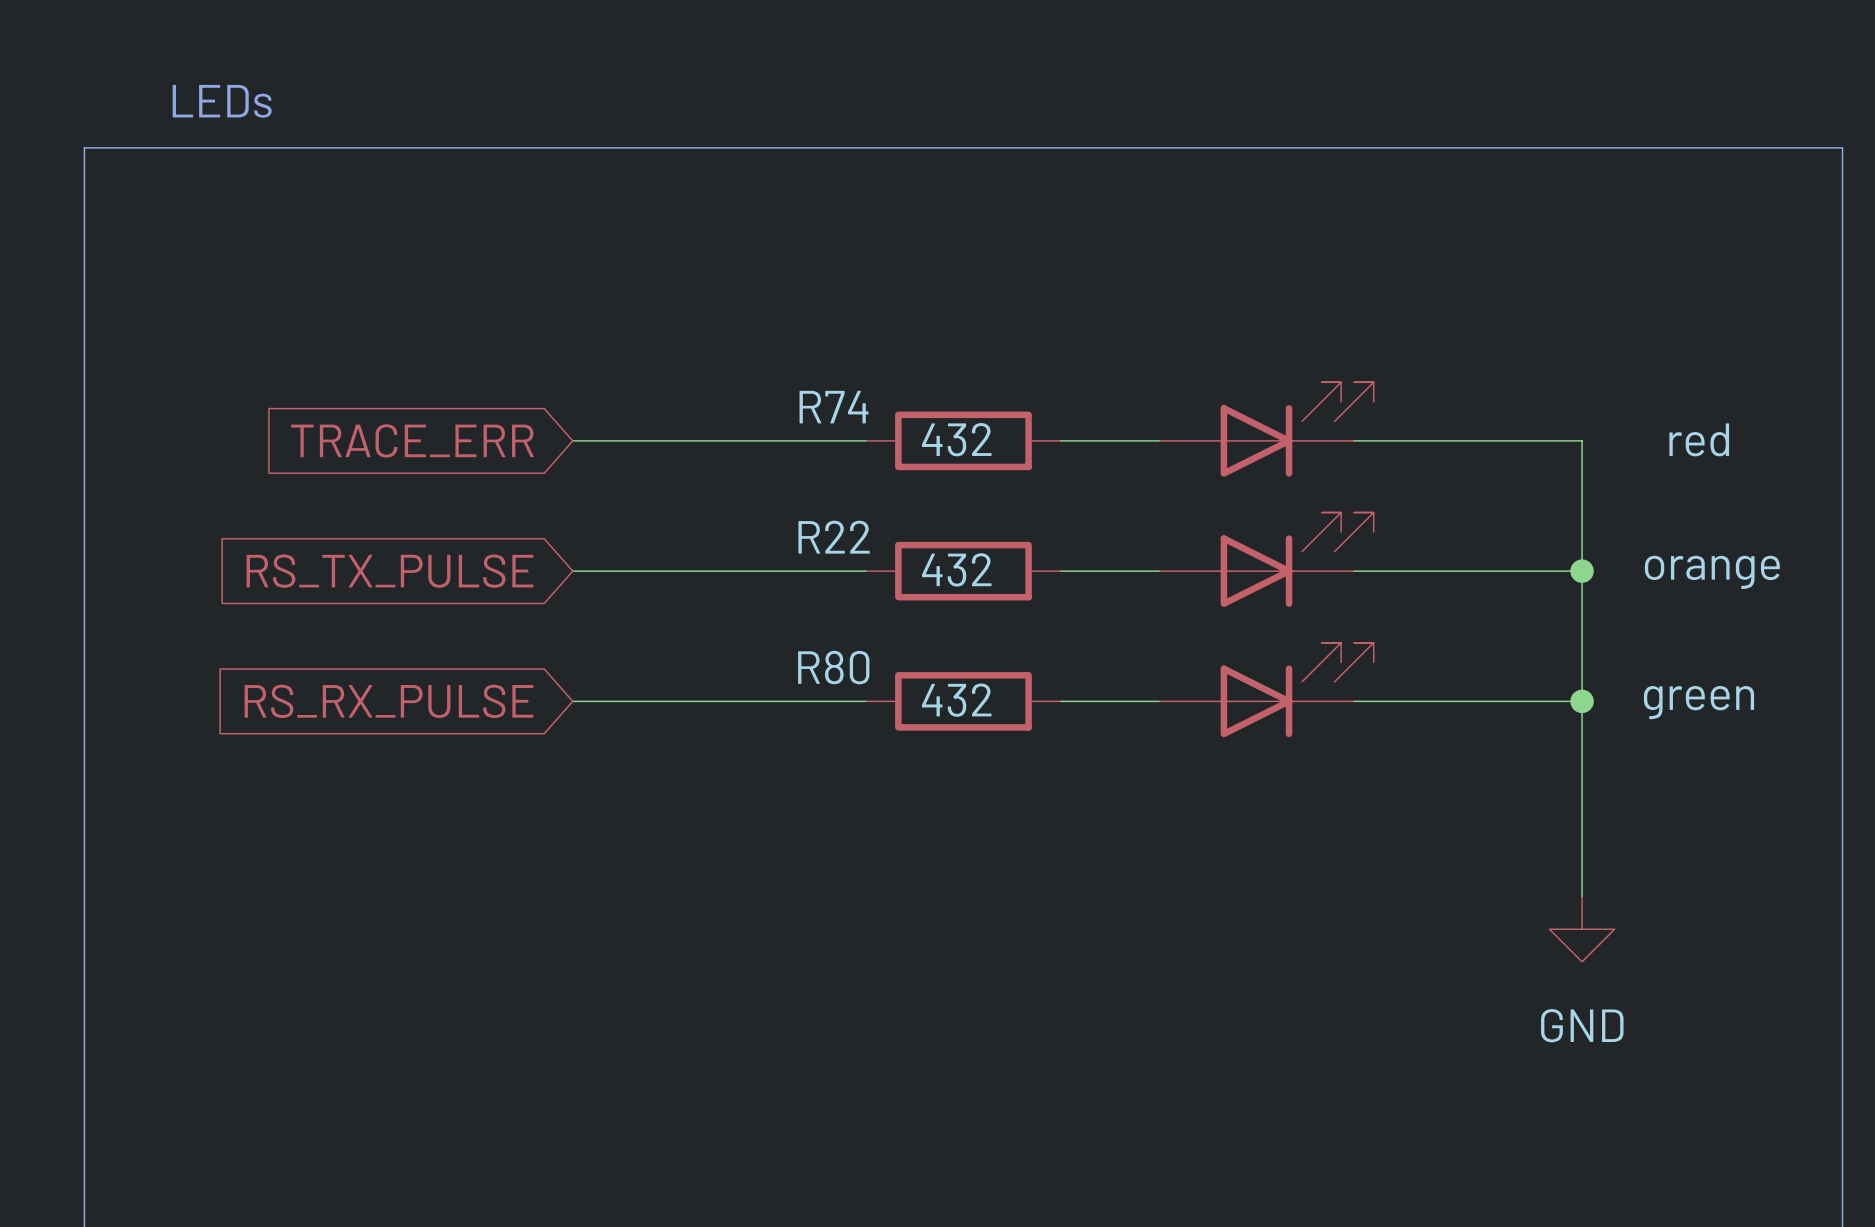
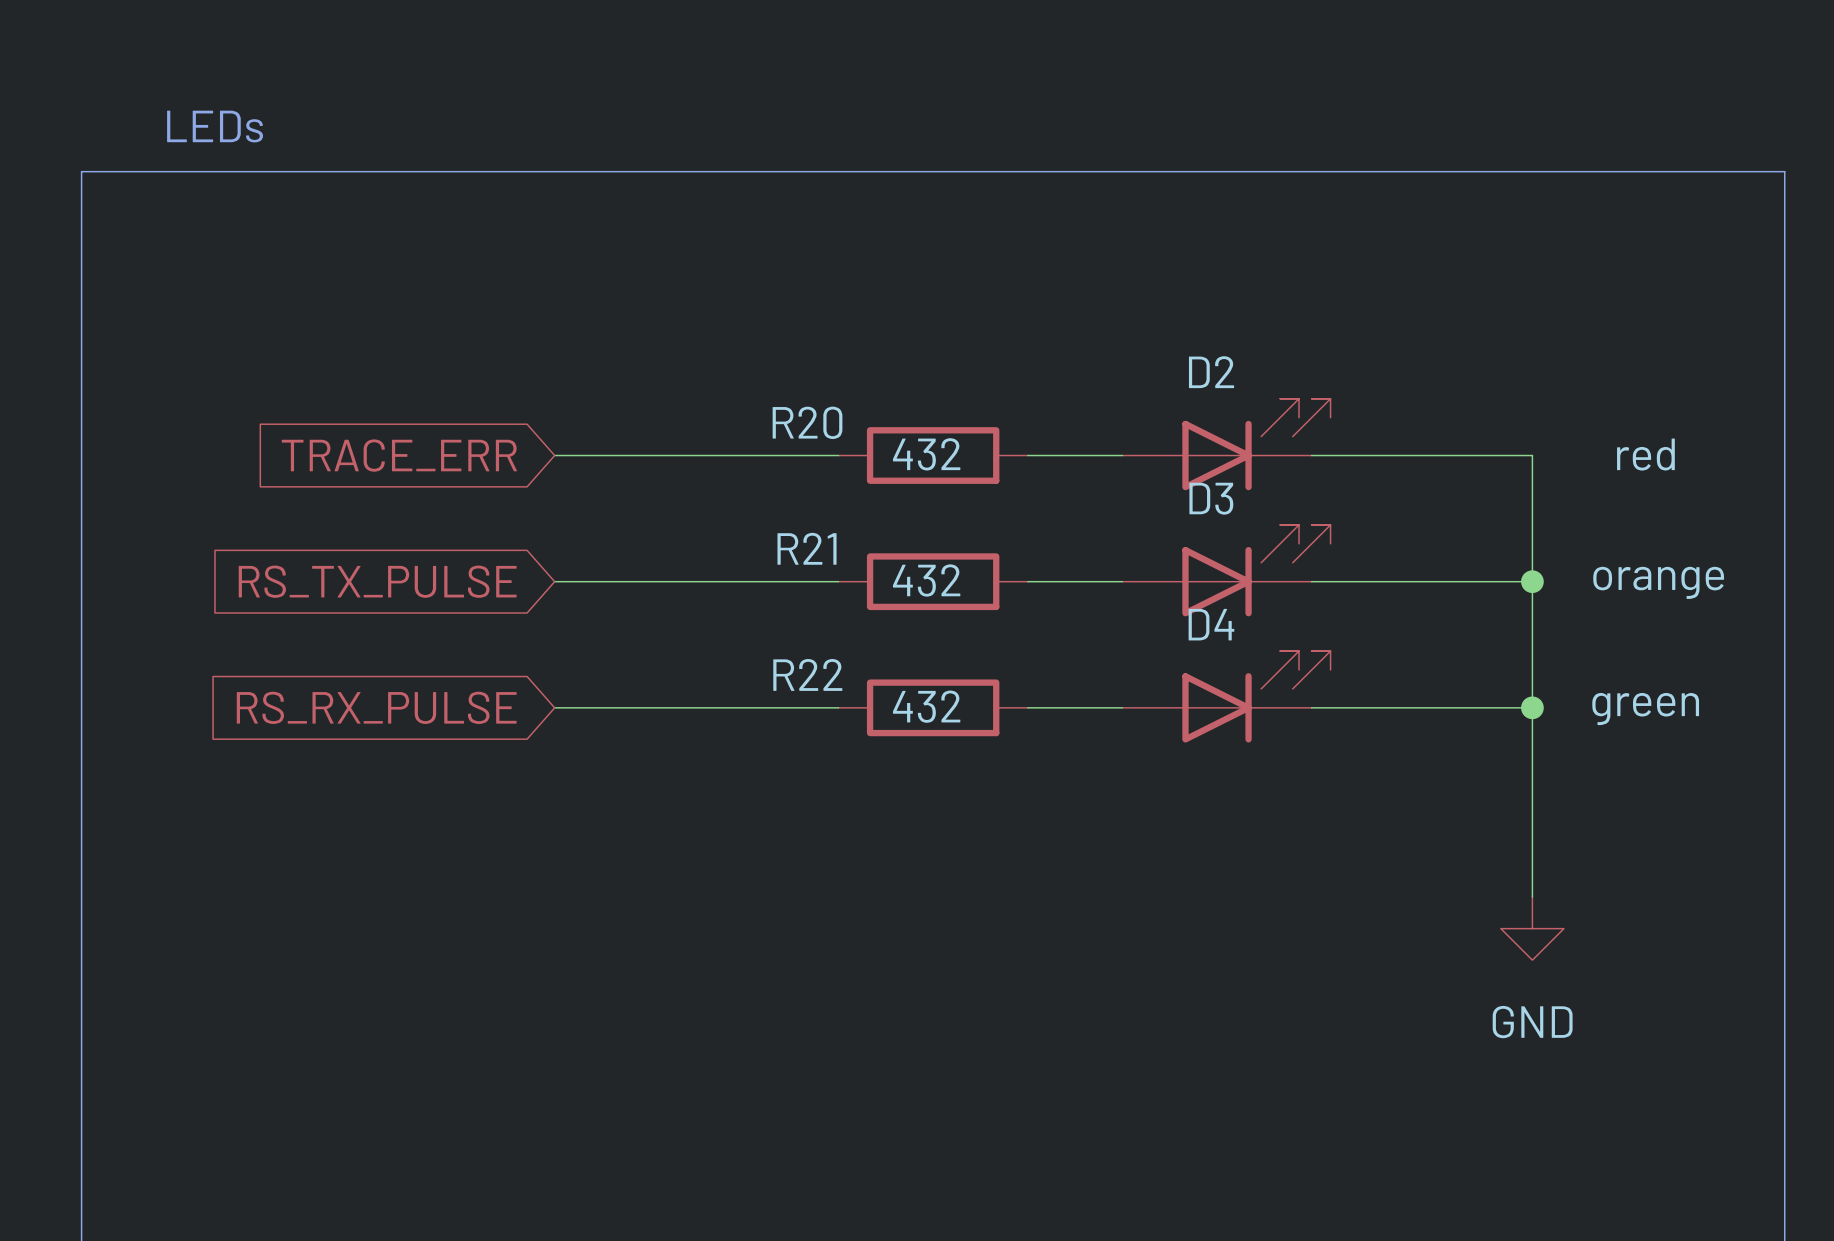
D2 name: none -> D2 (1211, 372)
R74 name: R74 (834, 407) -> R20 (807, 422)
D3 name: none -> D3 (1211, 498)
R22 name: R22 (834, 537) -> R21 (807, 548)
D4 name: none -> D4 (1211, 624)
R80 name: R80 (833, 667) -> R22 (807, 674)

